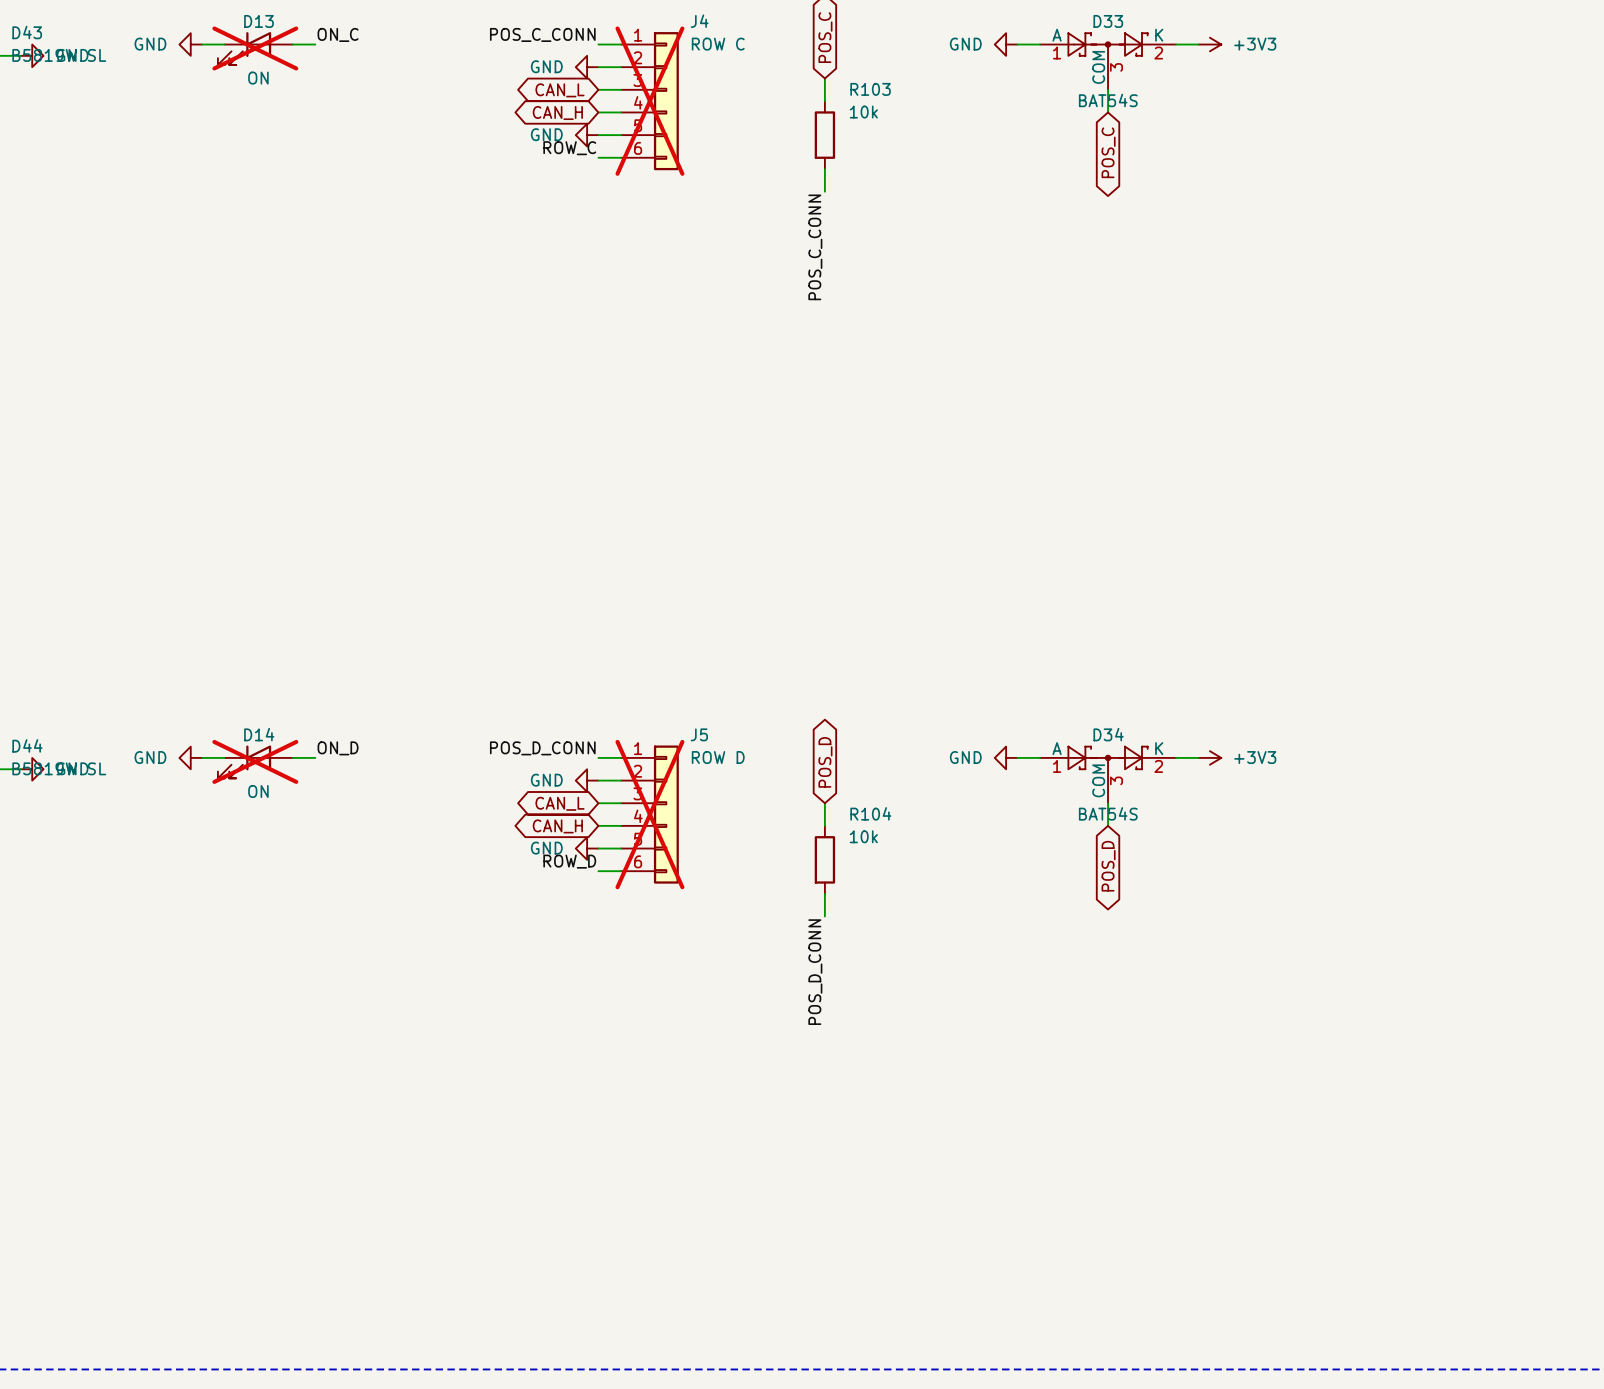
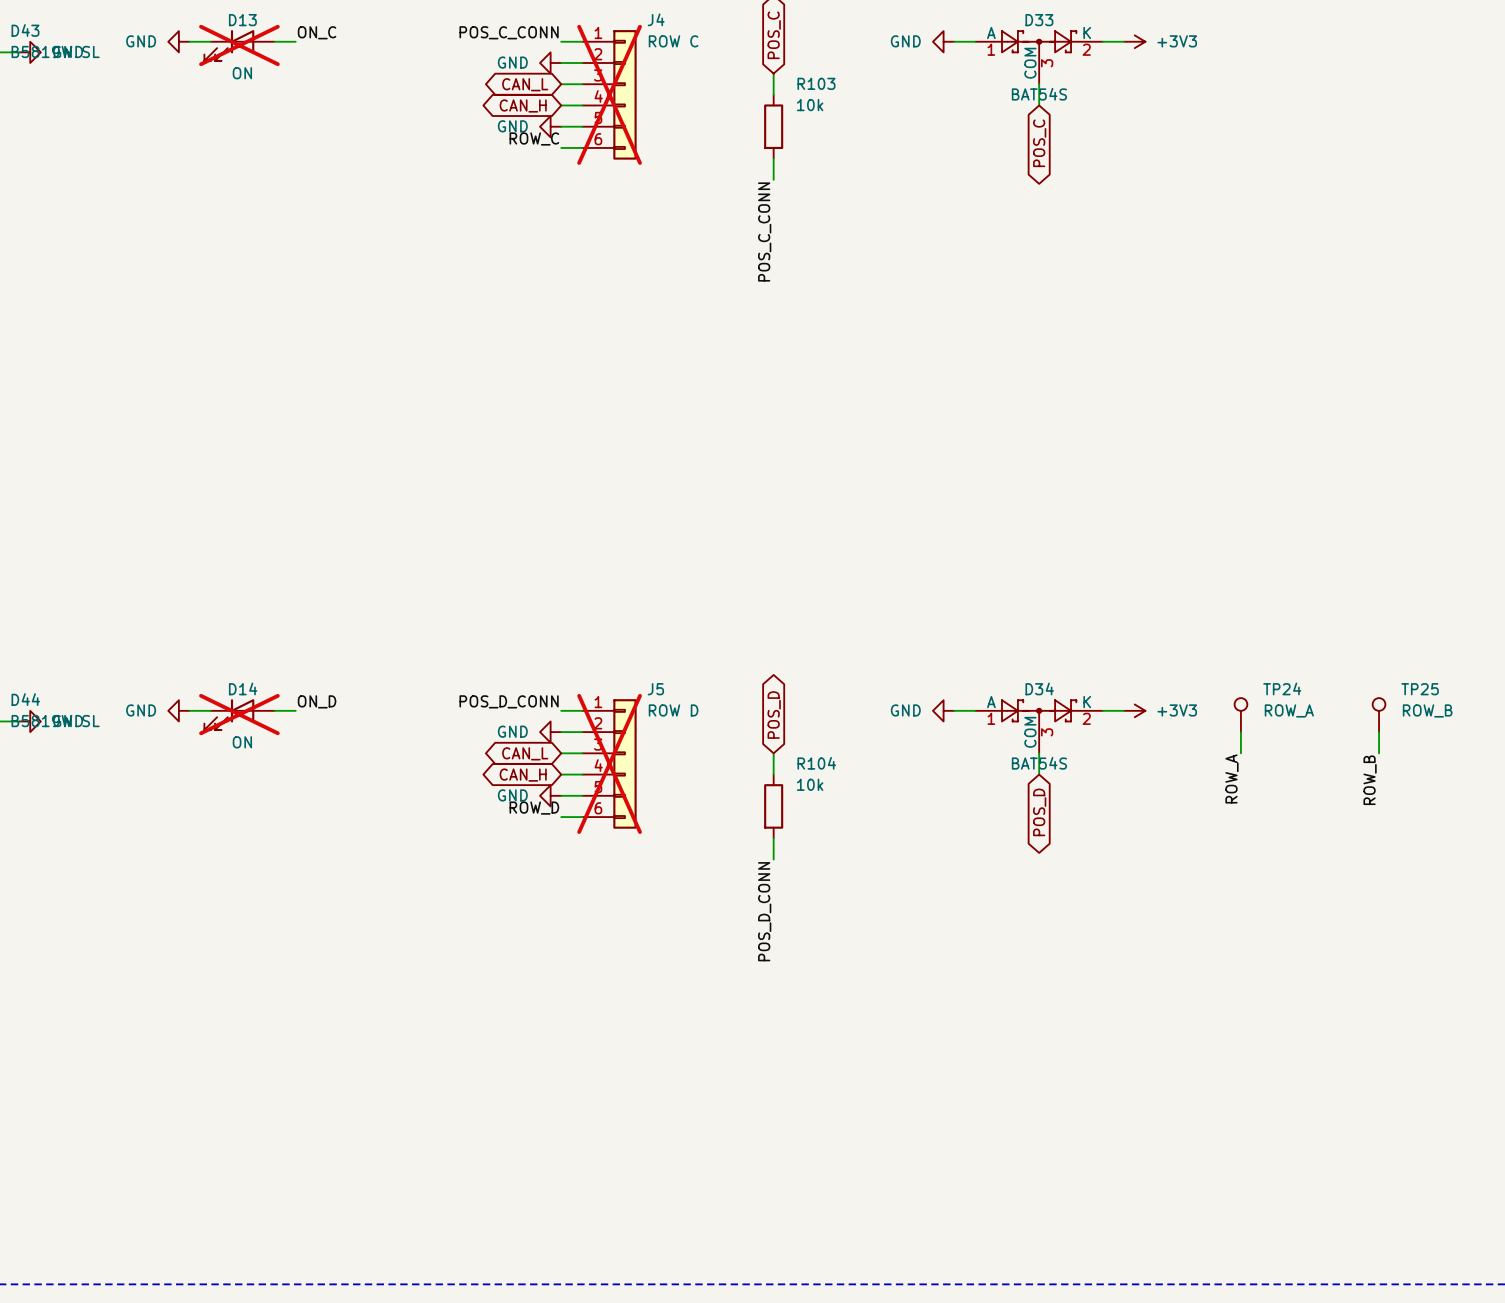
TP24: none -> ROW_A (1240, 715)
TP25: none -> ROW_B (1379, 715)
wire: none -> (1240, 732) (1240, 753)
wire: none -> (1379, 732) (1379, 753)
label: none -> ROW_A (1231, 778)
label: none -> ROW_B (1370, 780)

